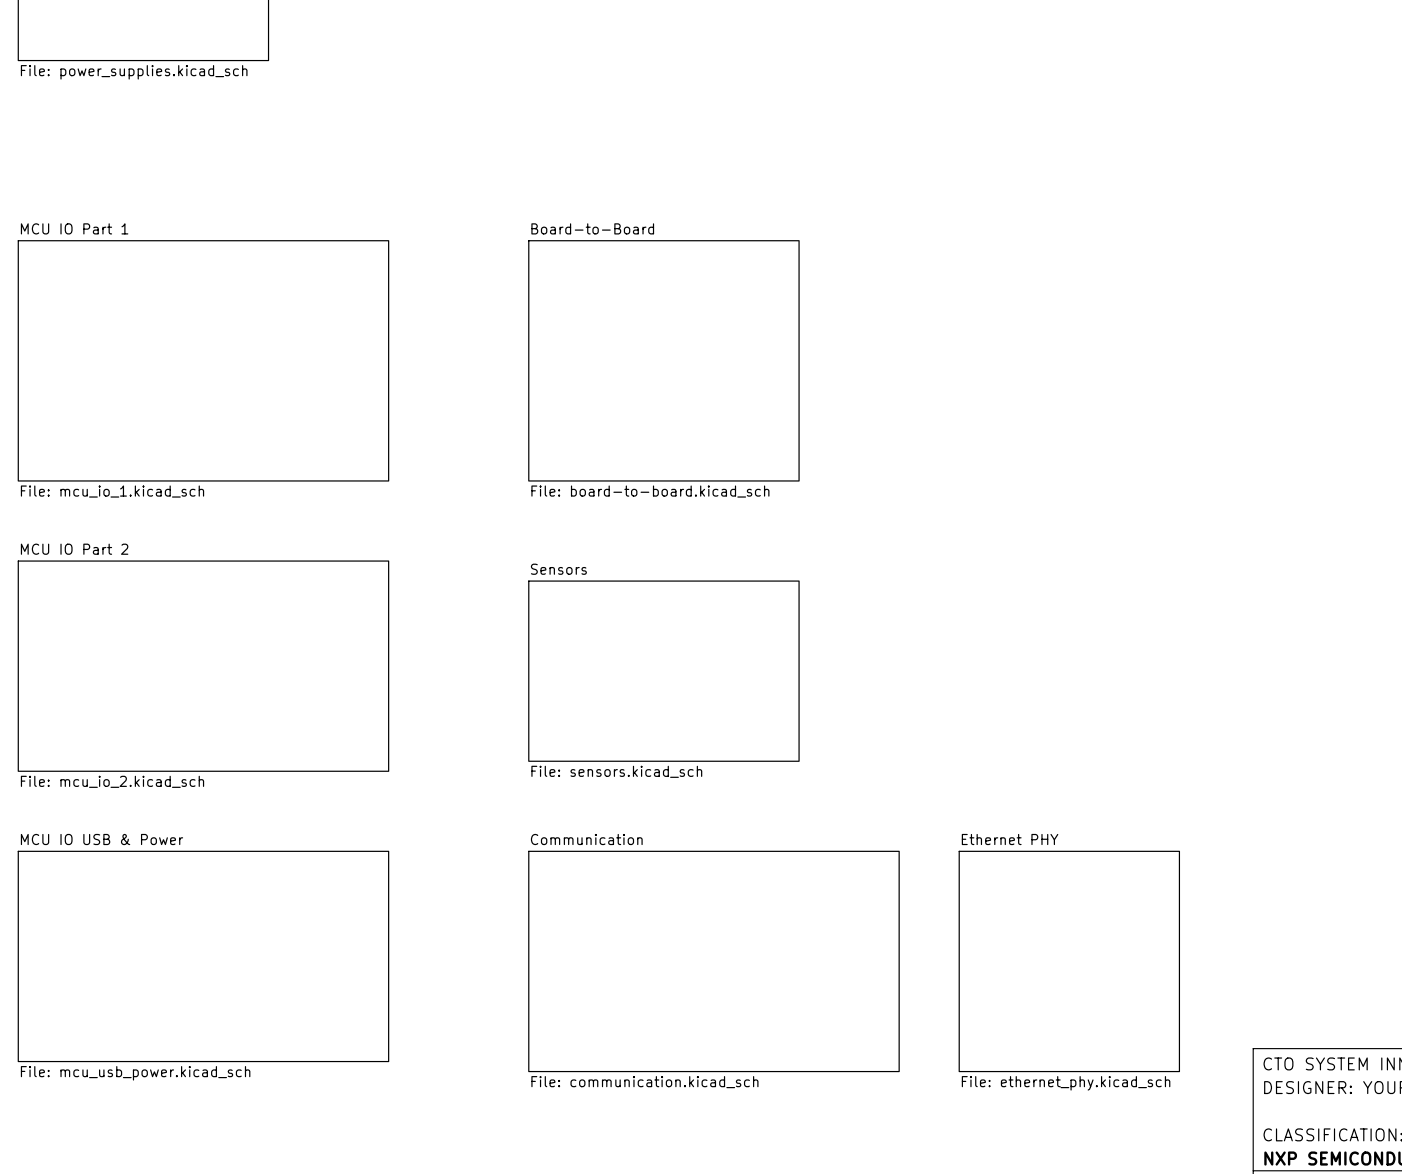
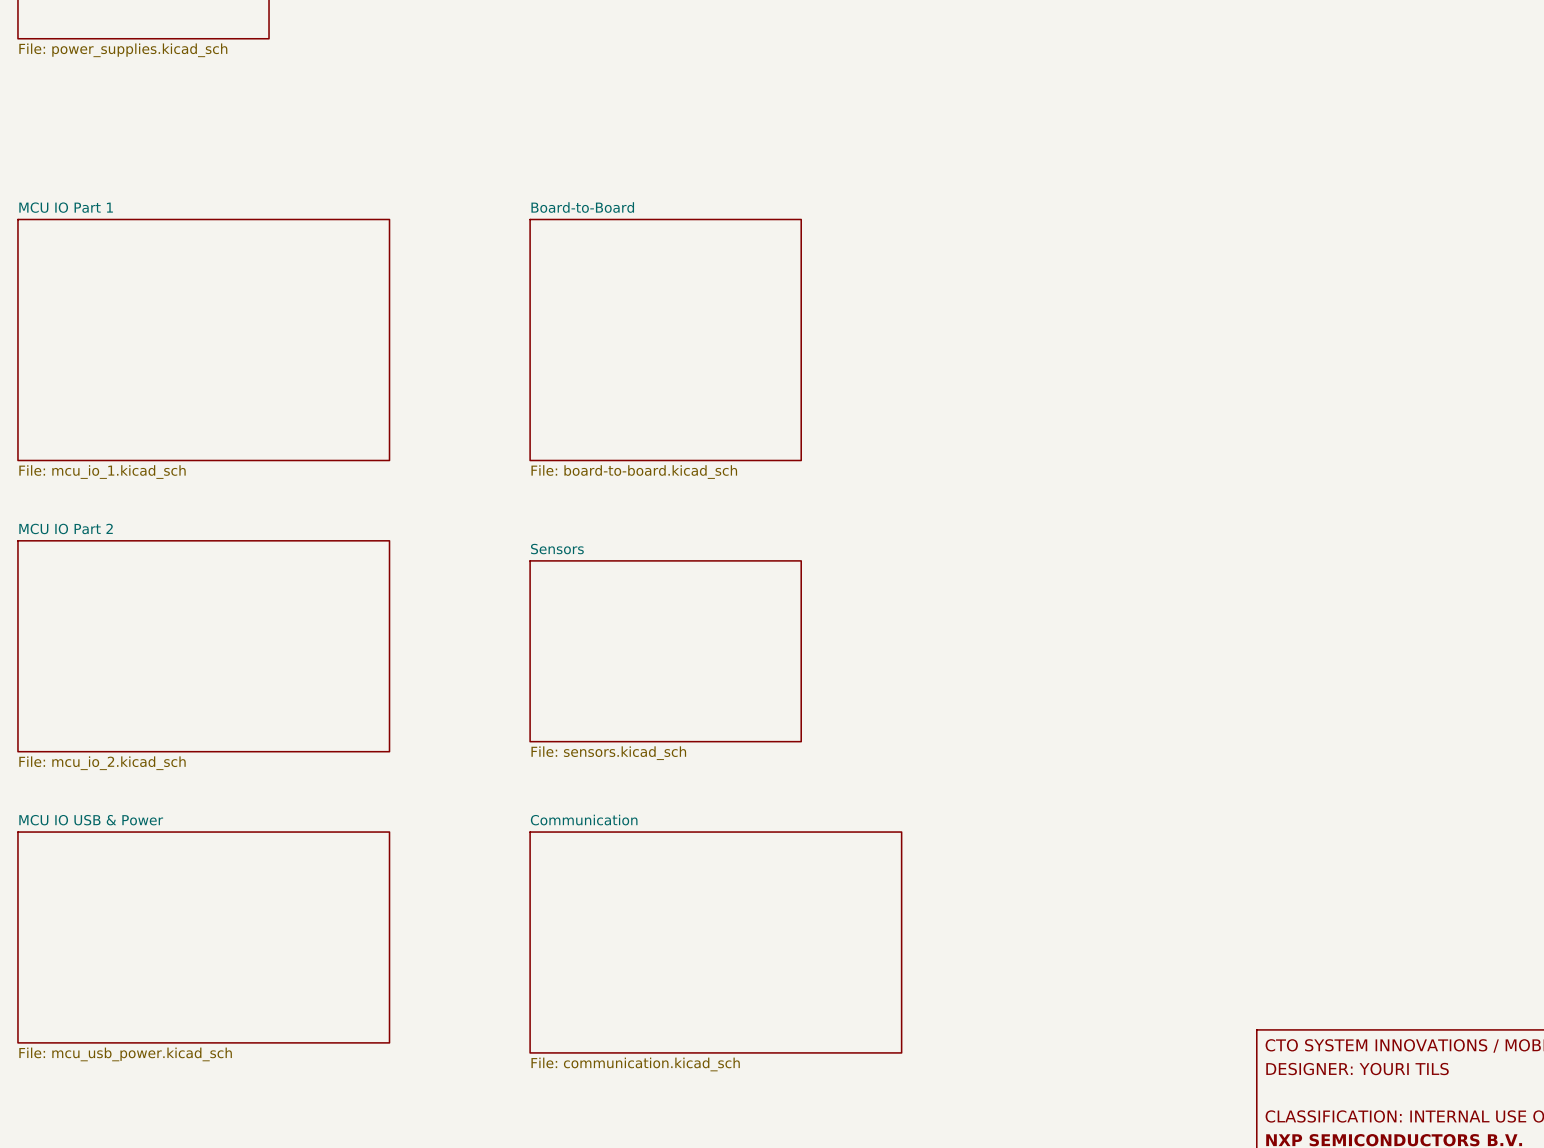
sheet Ethernet PHY: File: ethernet_phy.kicad_sch (1069, 961) -> none

